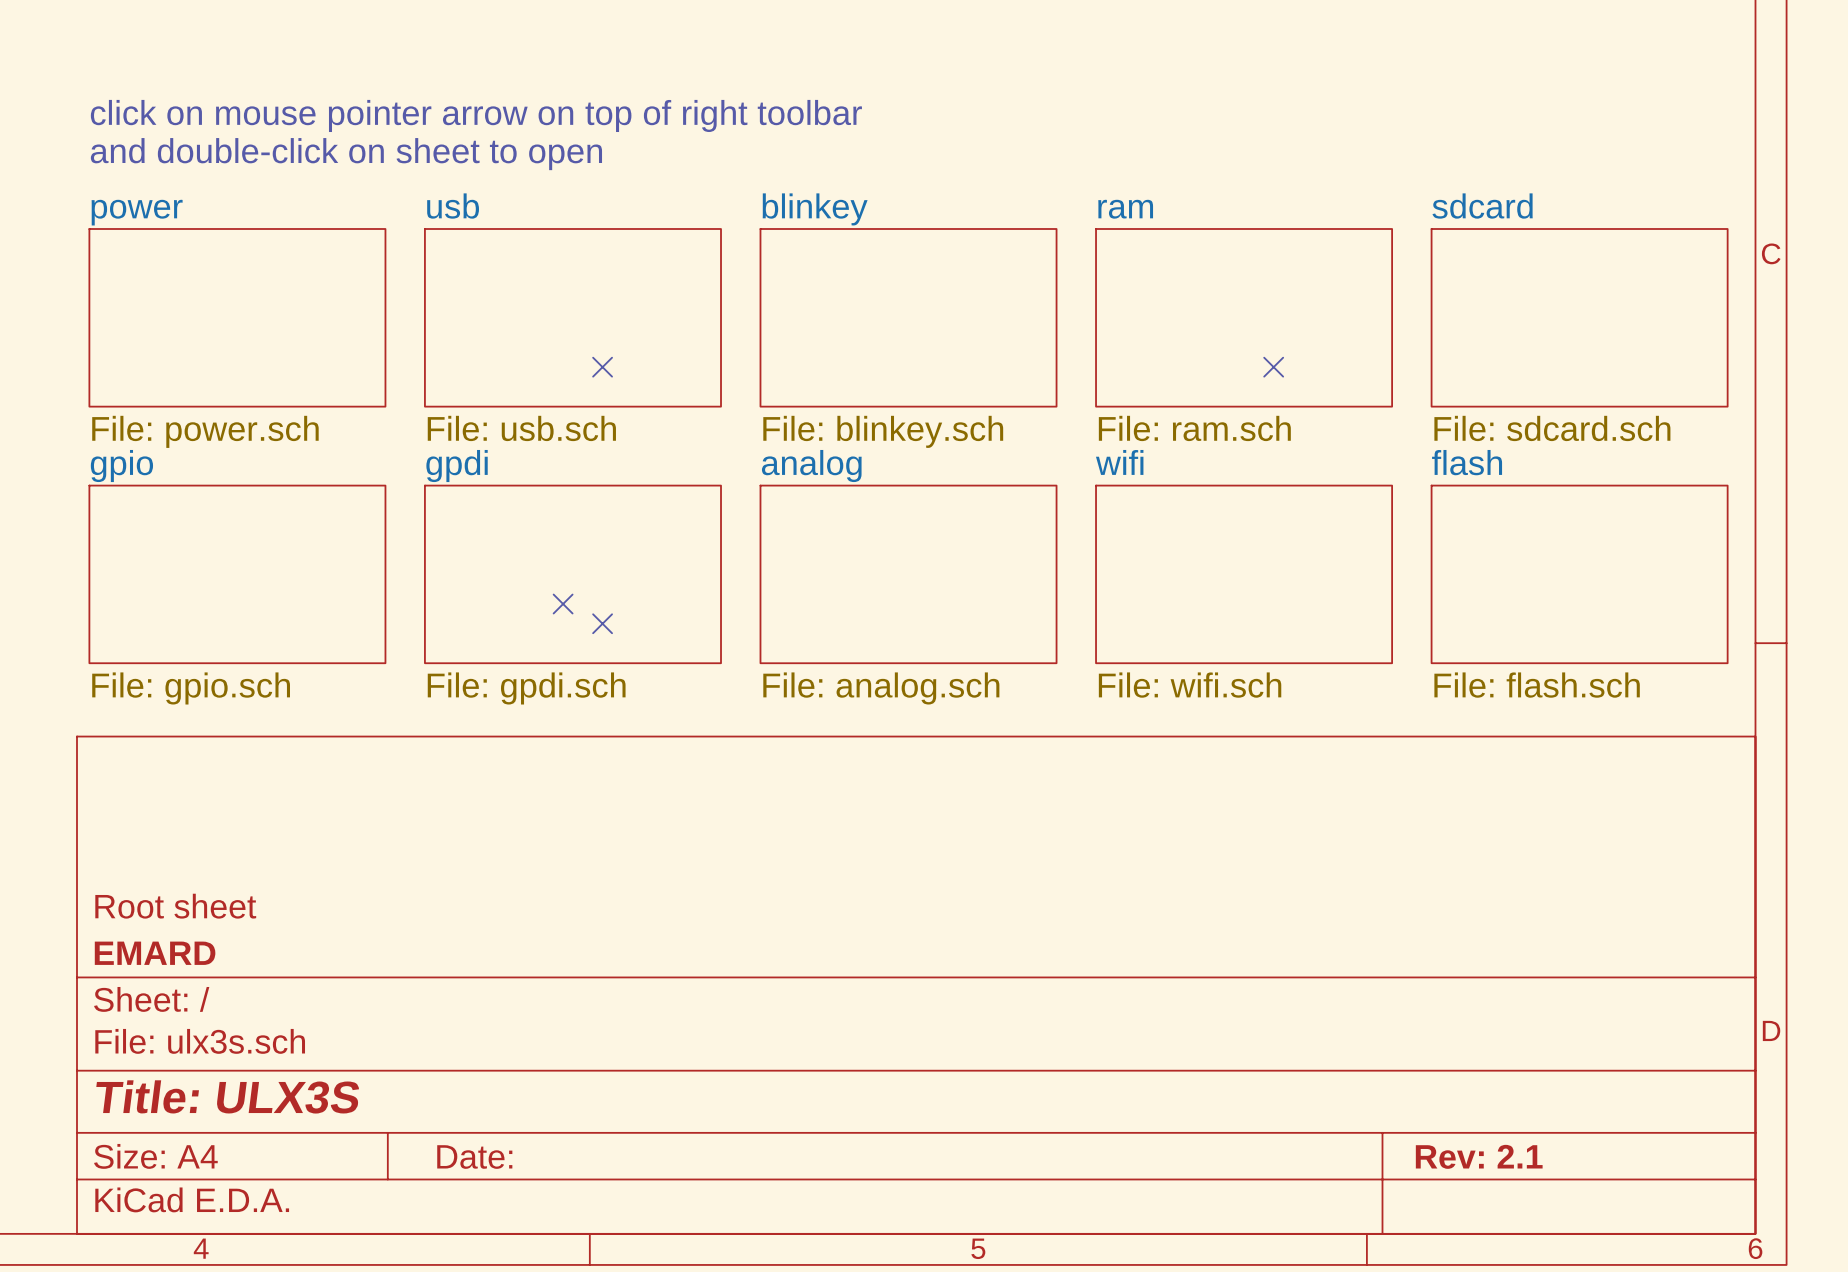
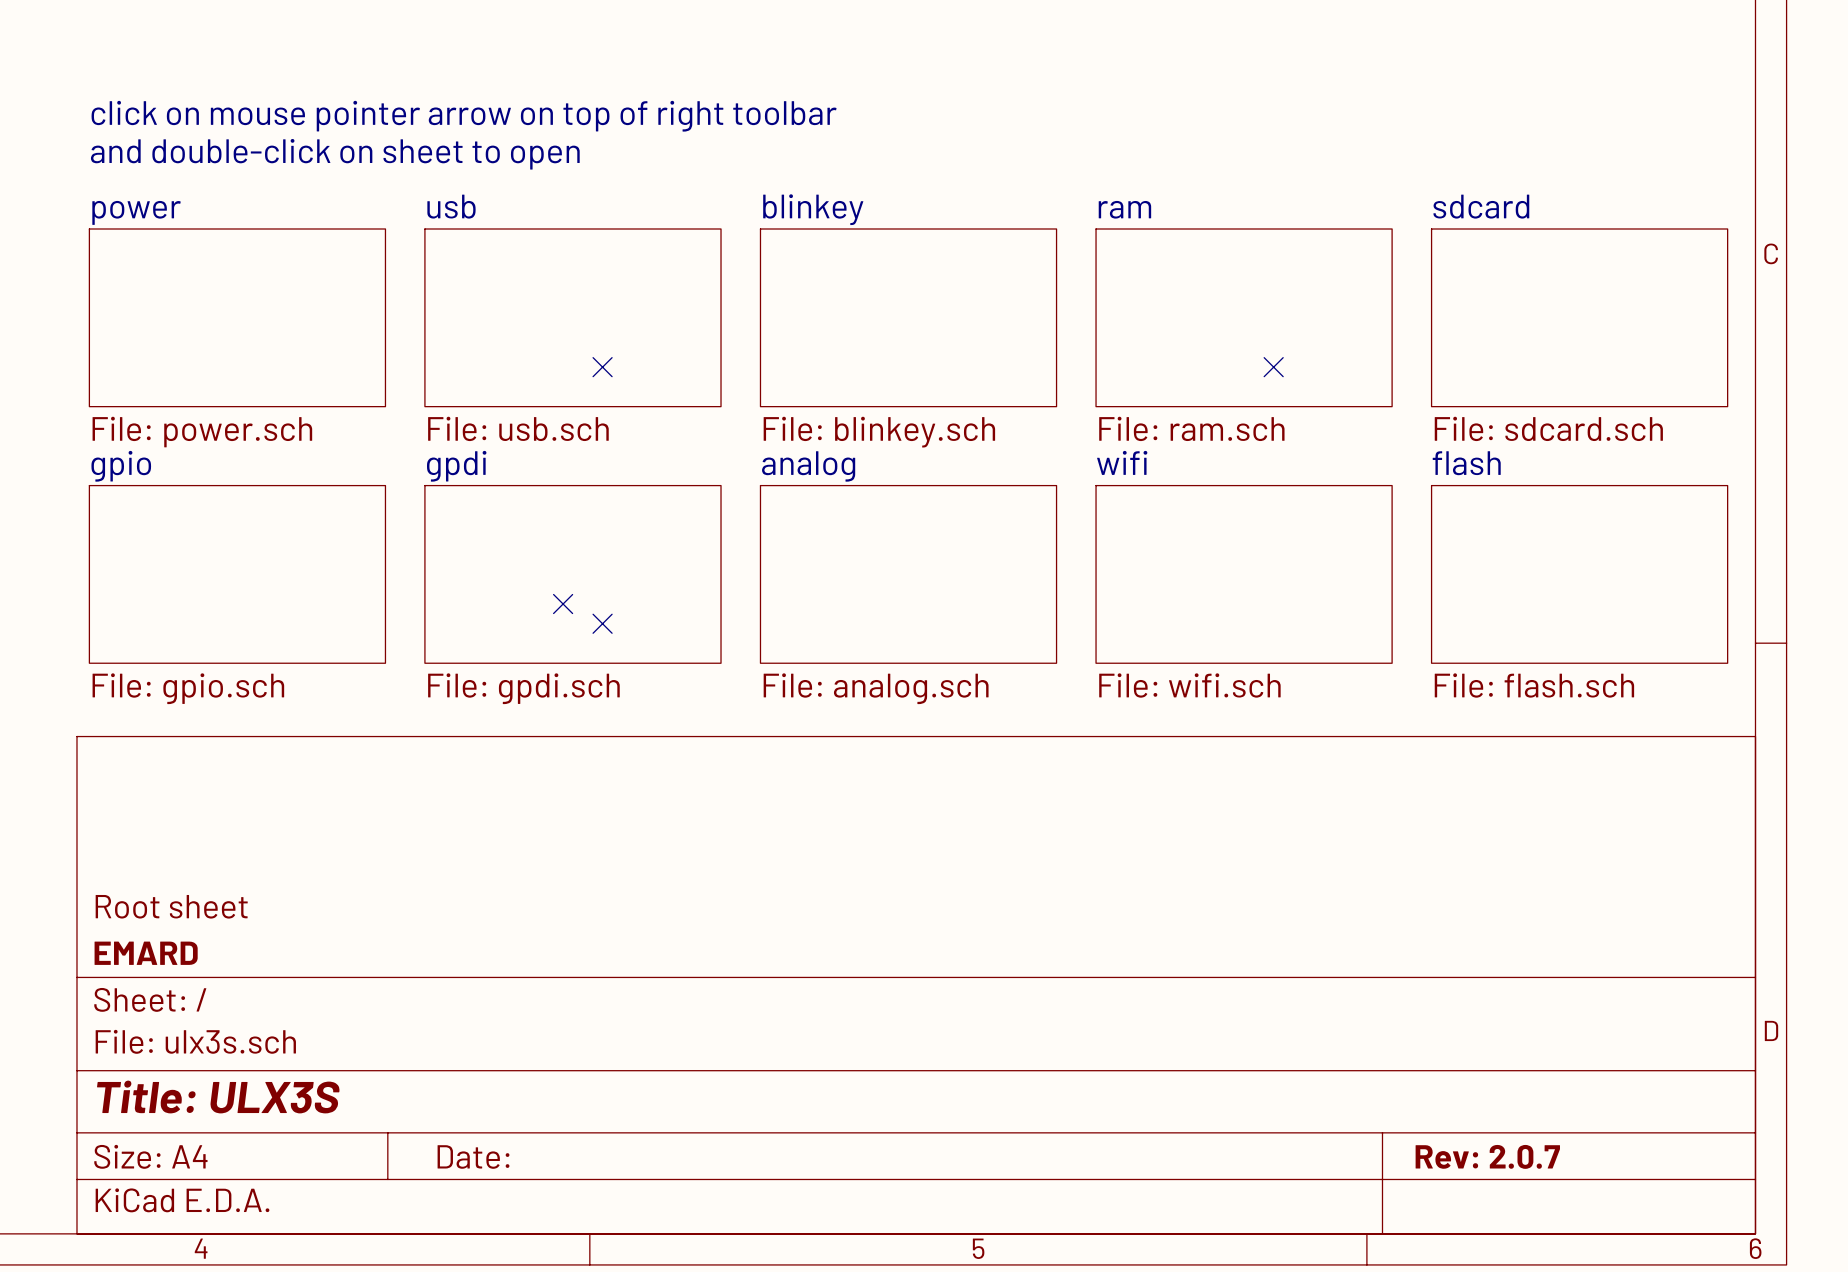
title block: Rev: 2.1 (1479, 1156) -> Rev: 2.0.7 (1487, 1156)

